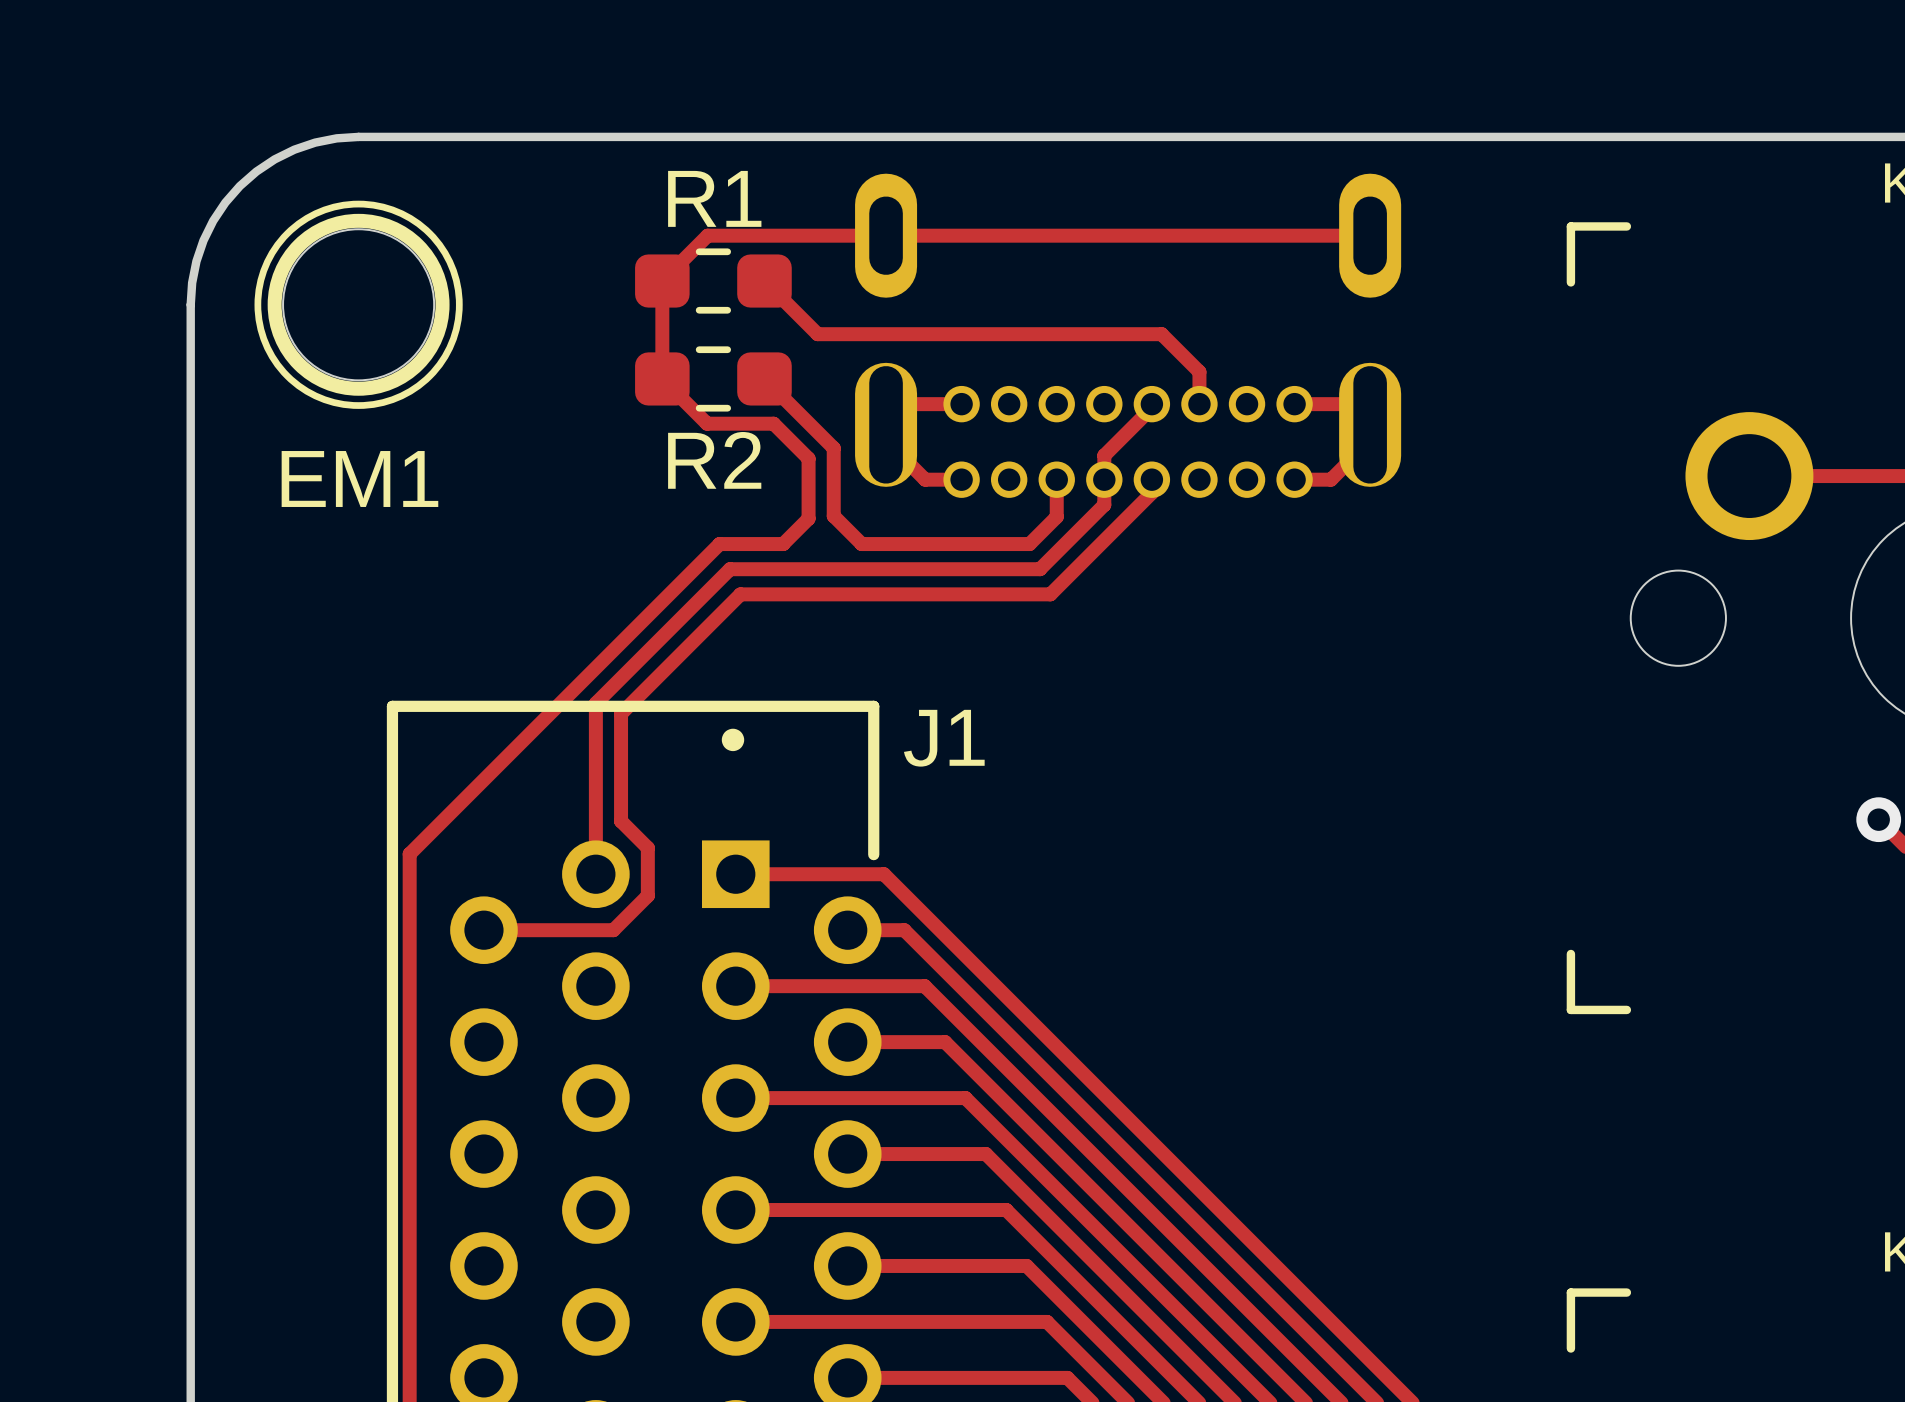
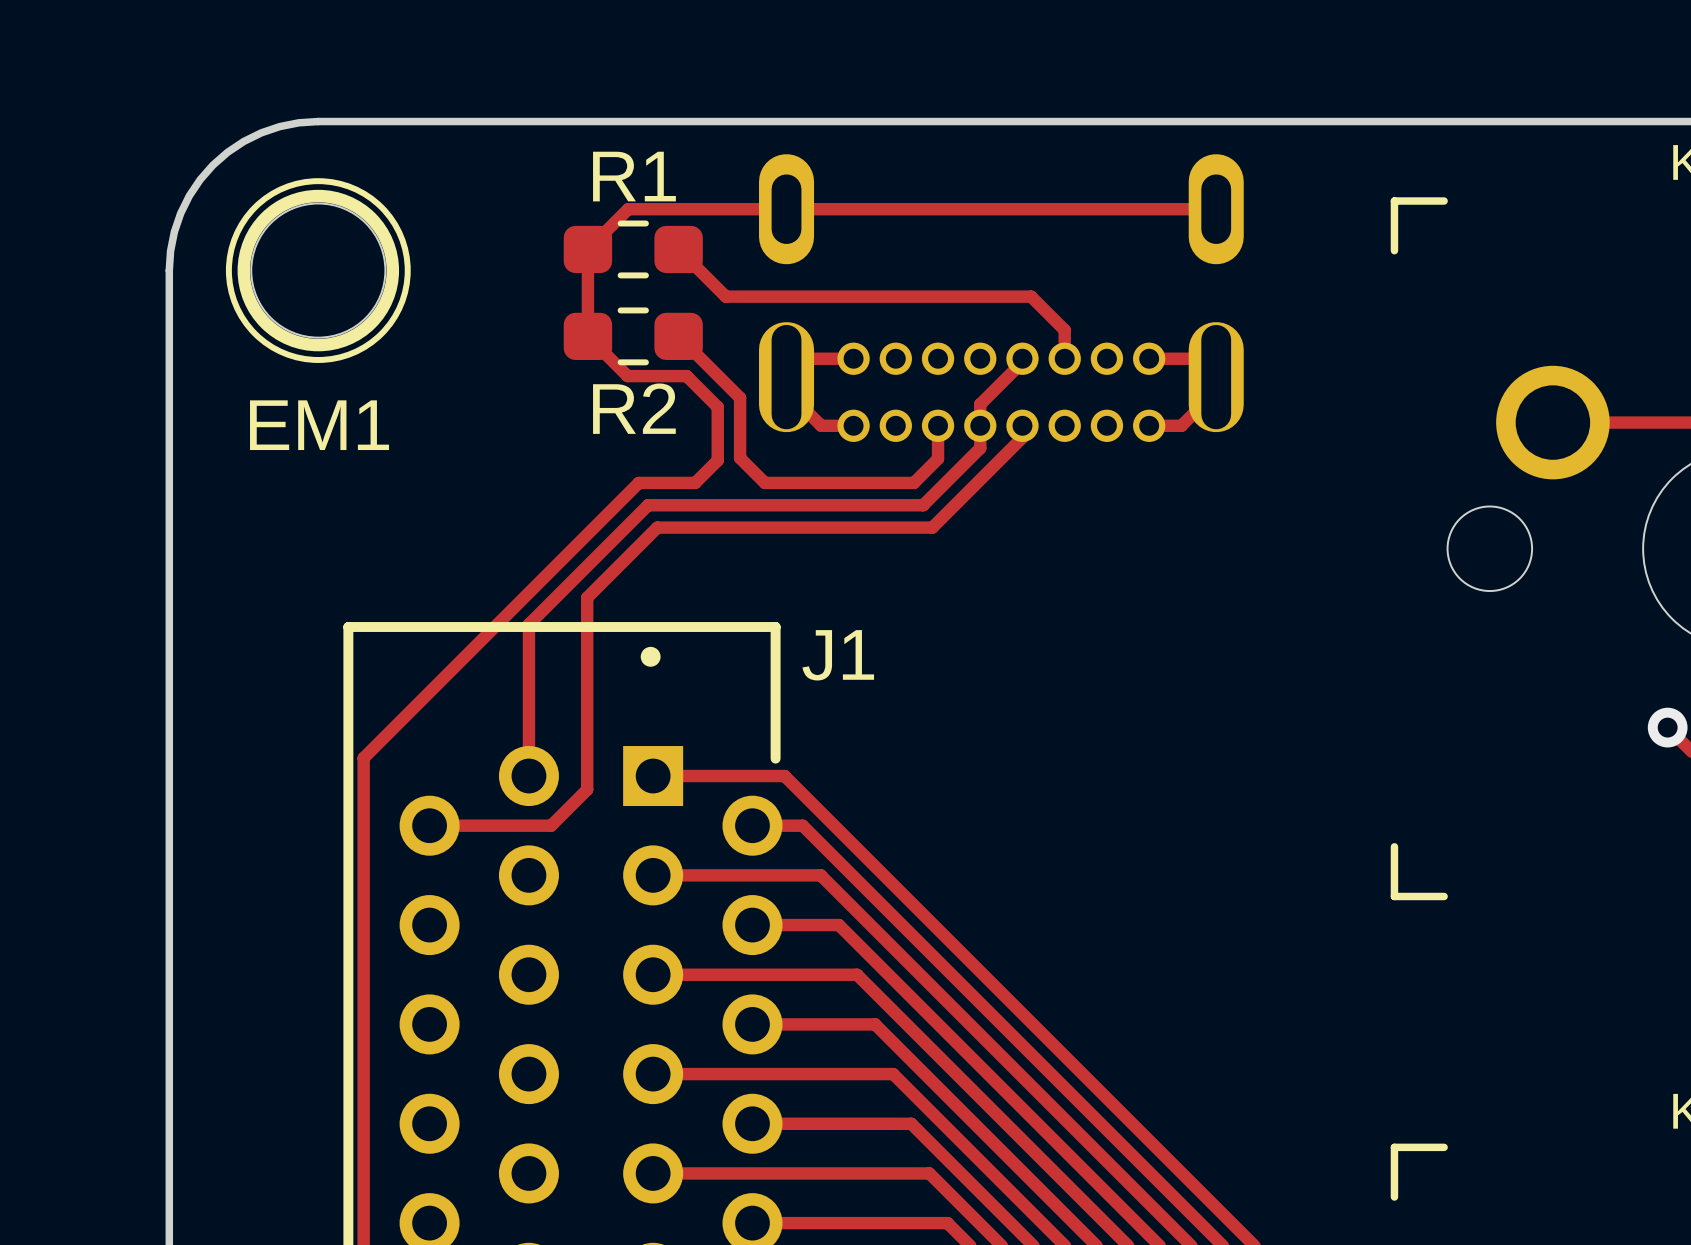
track: (661, 673) (621, 713) (621, 821) (647, 847) (647, 895) (613, 930) -> (587, 597) (587, 789) (551, 825) (544, 825)

